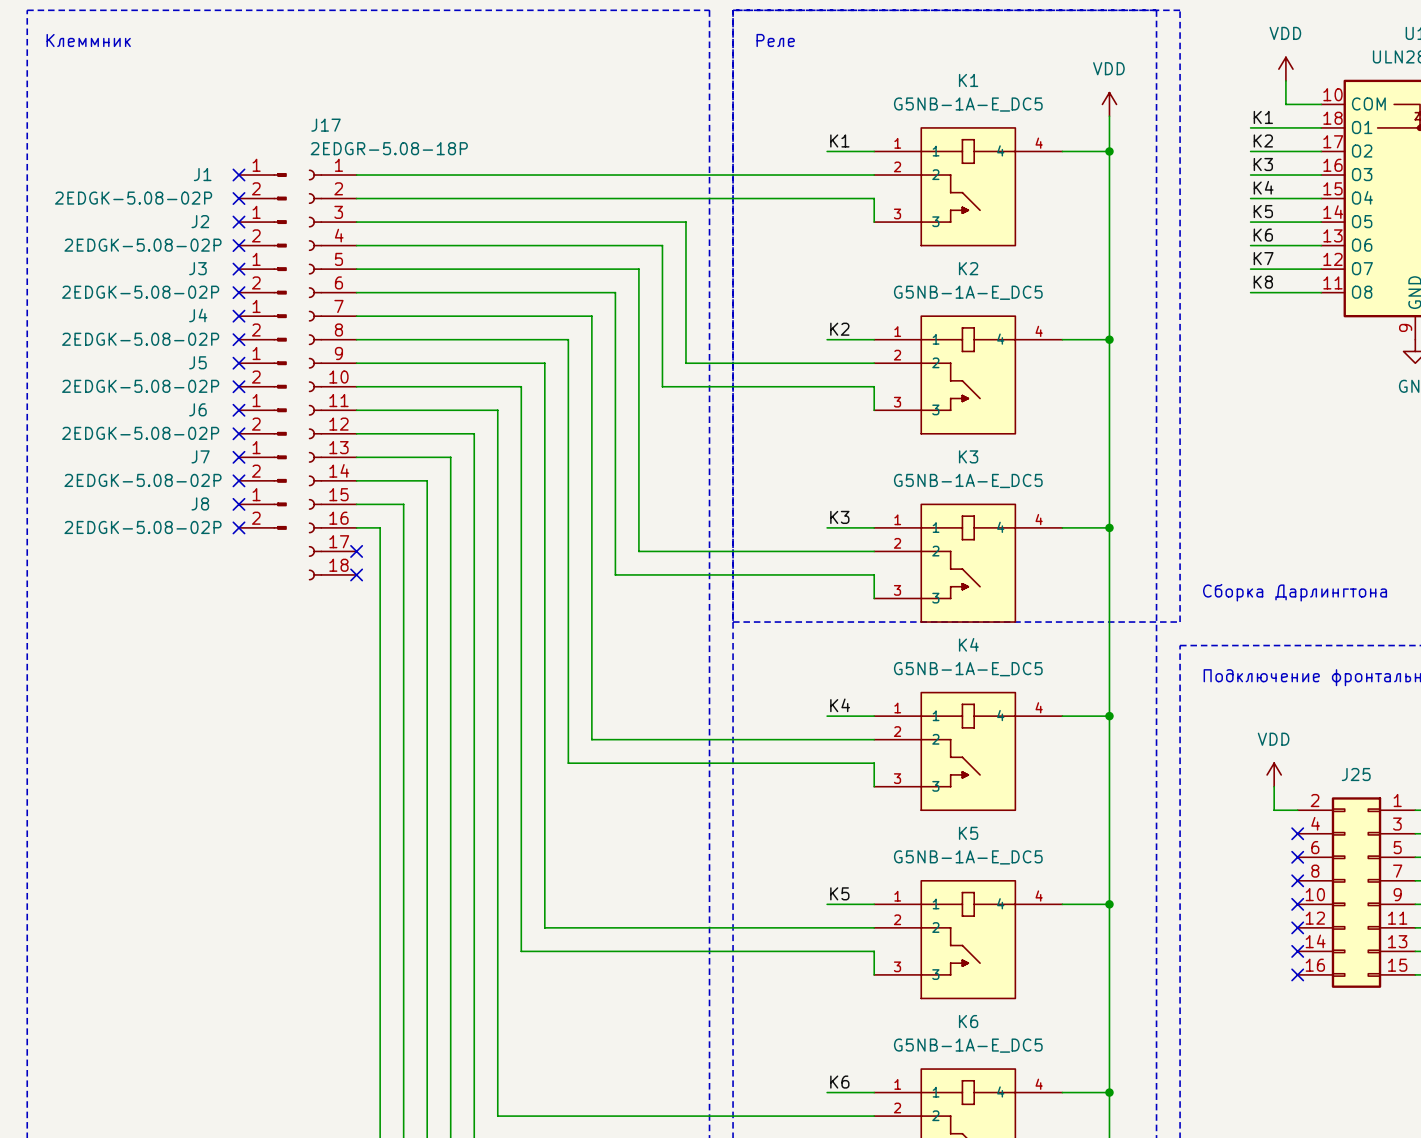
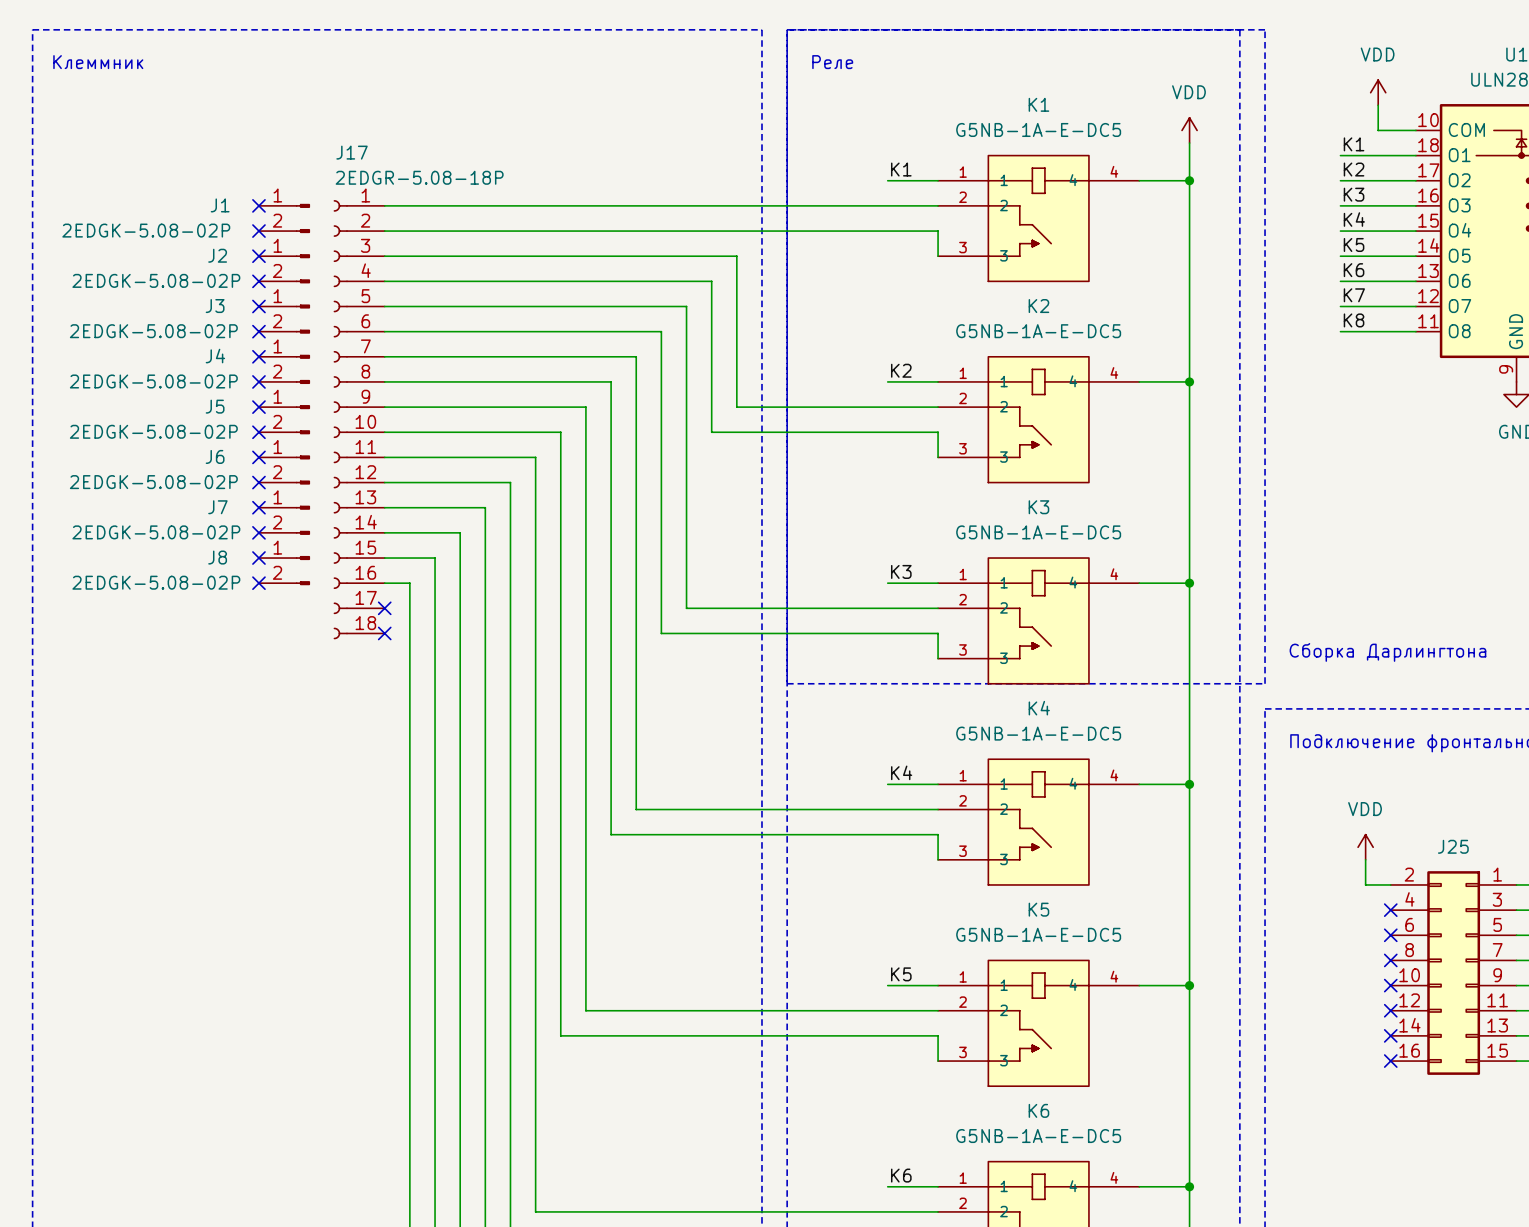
K1 value: G5NB-1A-E_DC5 (968, 104) -> G5NB-1A-E-DC5 (1038, 129)
K2 value: G5NB-1A-E_DC5 (968, 292) -> G5NB-1A-E-DC5 (1038, 331)
K3 value: G5NB-1A-E_DC5 (968, 480) -> G5NB-1A-E-DC5 (1038, 532)
K4 value: G5NB-1A-E_DC5 (968, 669) -> G5NB-1A-E-DC5 (1038, 733)
K5 value: G5NB-1A-E_DC5 (968, 857) -> G5NB-1A-E-DC5 (1038, 934)
K6 value: G5NB-1A-E_DC5 (968, 1045) -> G5NB-1A-E-DC5 (1038, 1136)

